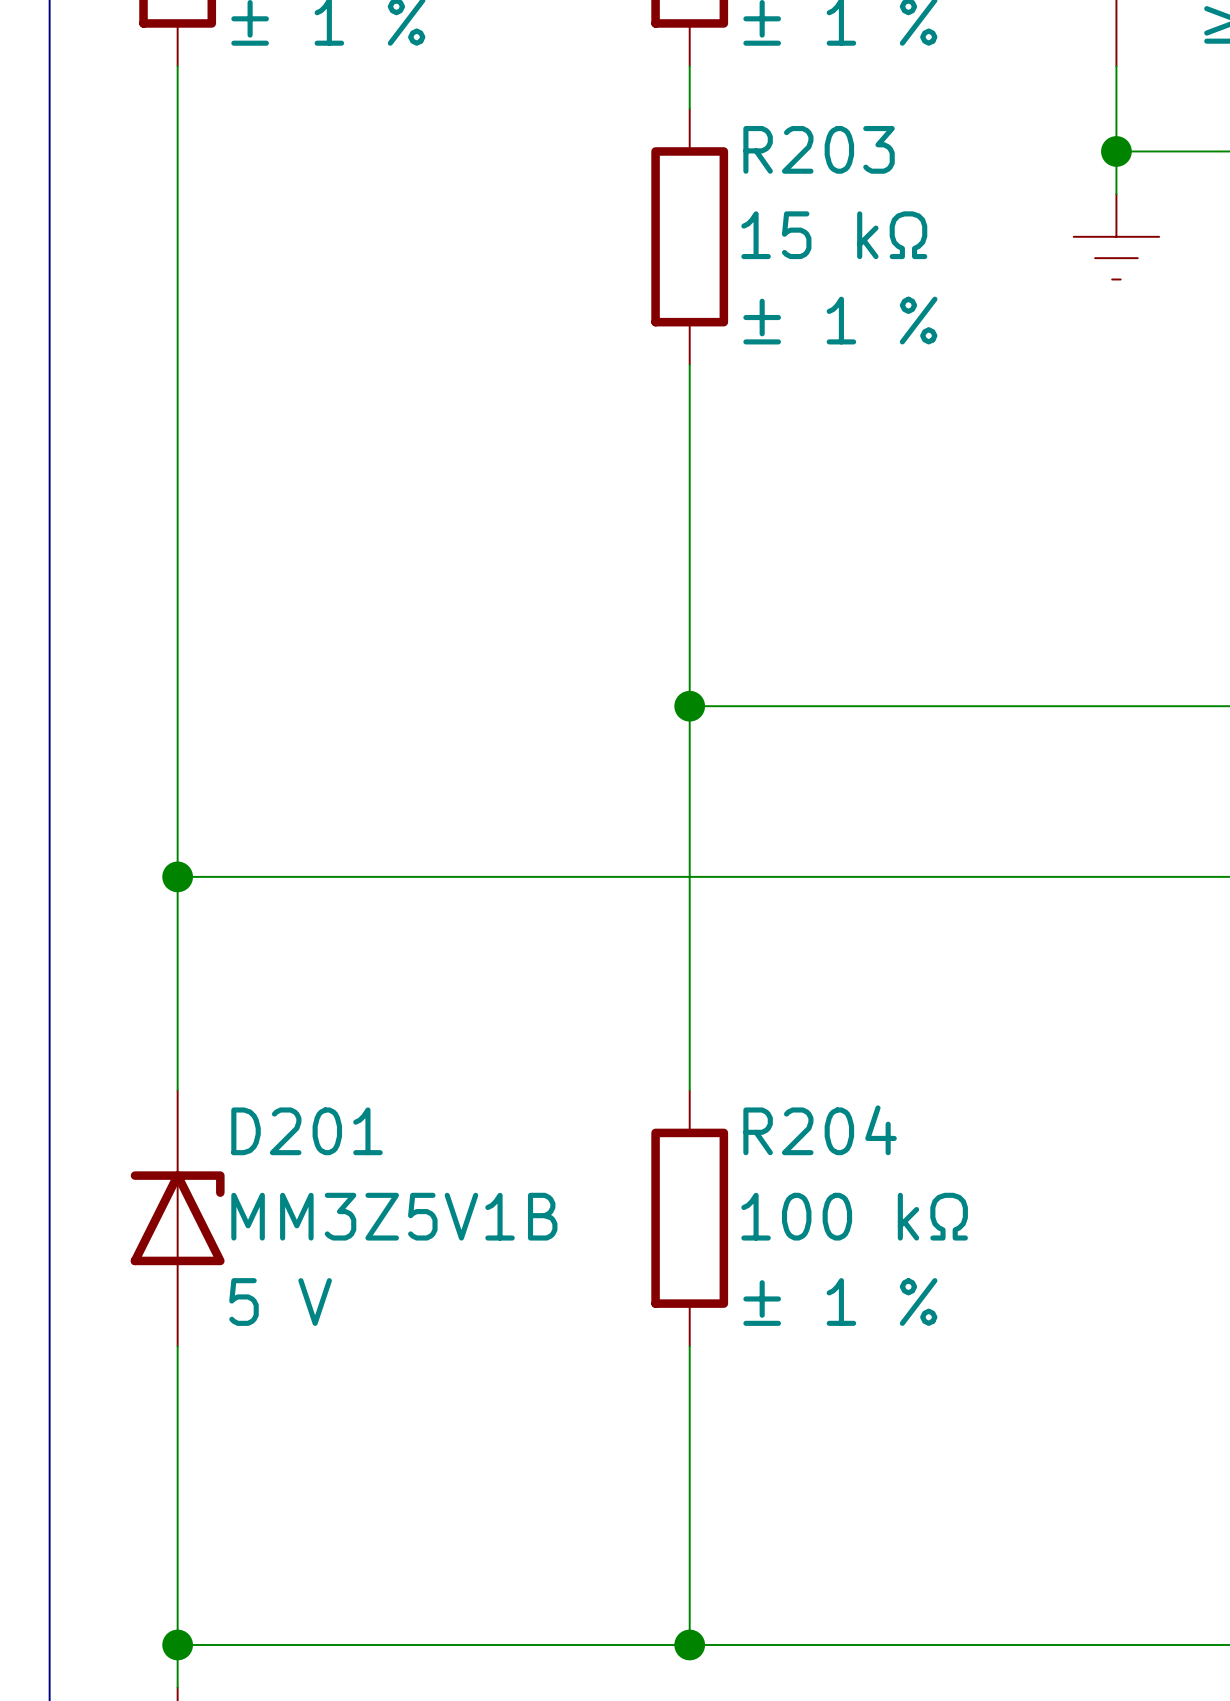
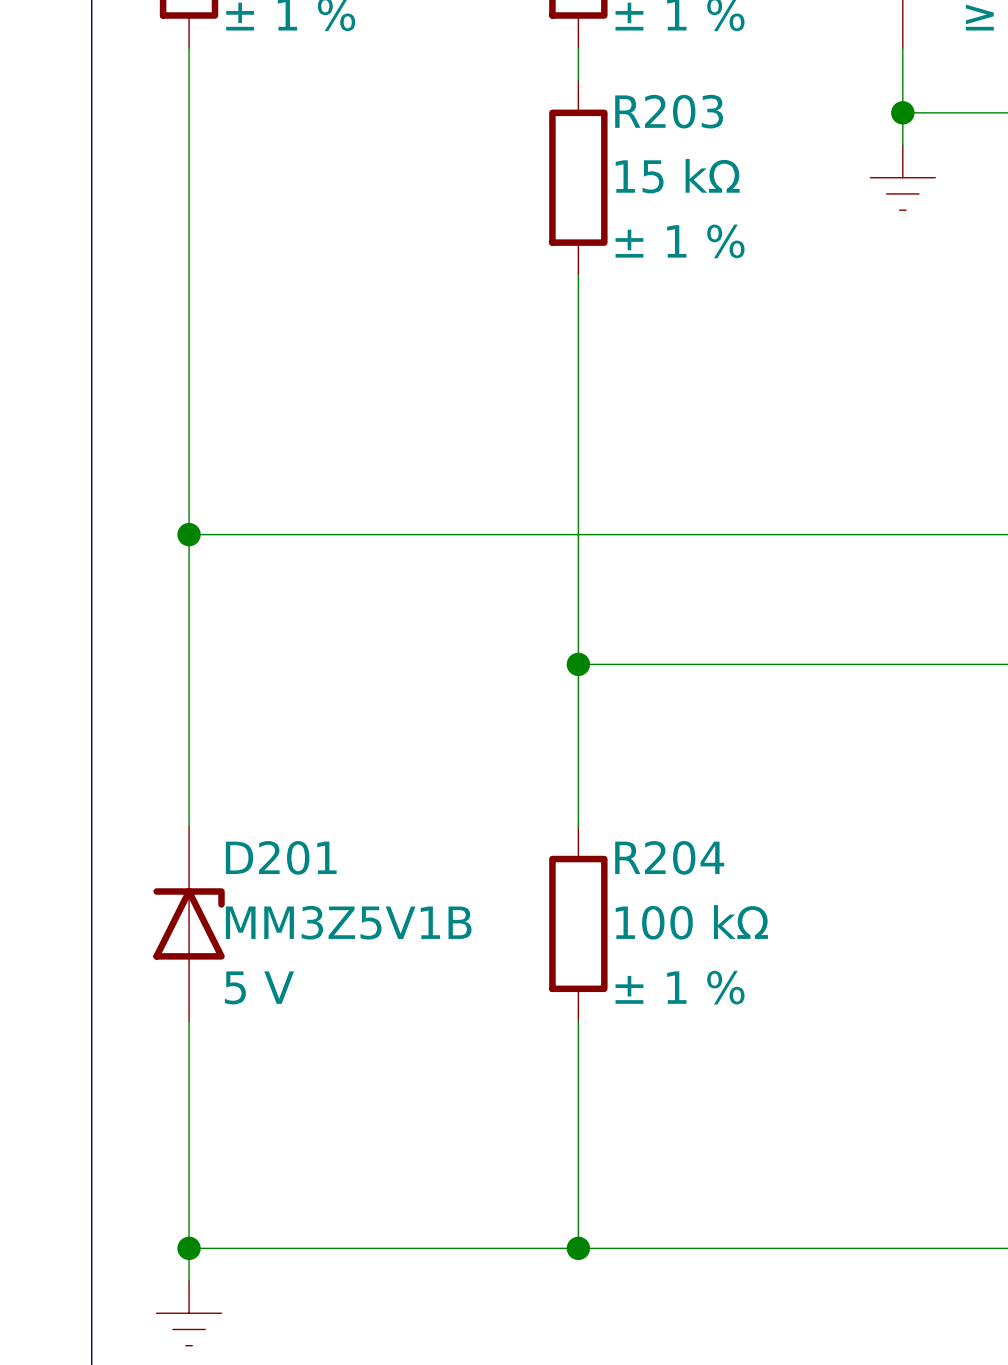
junction position: (689, 706) -> (578, 664)
wire: (177, 876) (689, 876) -> (189, 534) (578, 534)
junction position: (177, 876) -> (189, 534)

